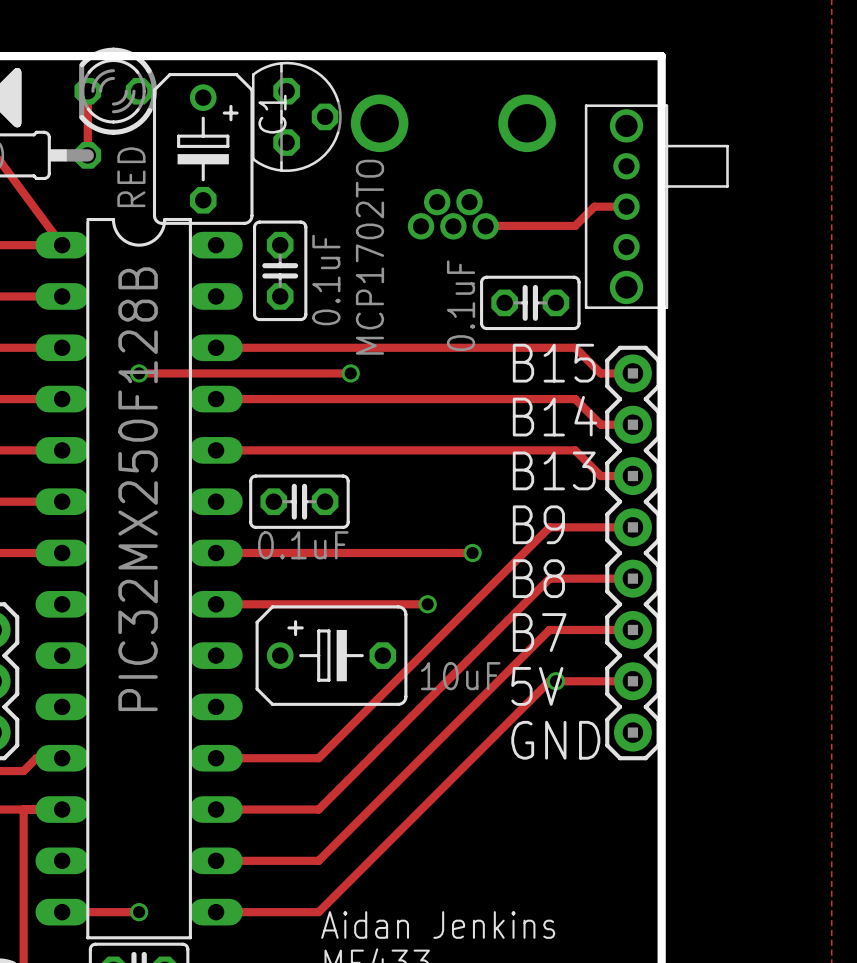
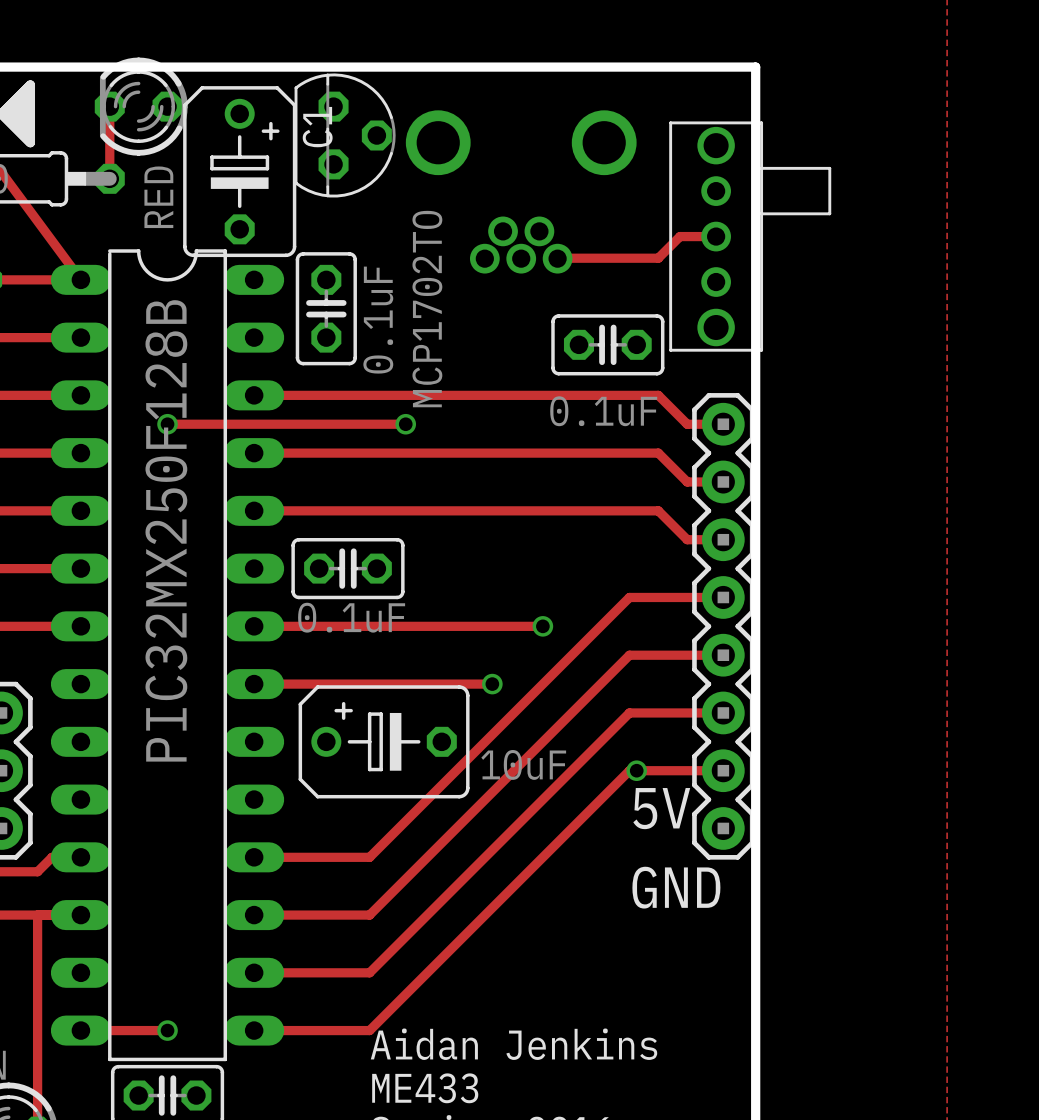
part value rotation: 0° (461, 305) -> 90° clockwise (603, 411)
text: B15 (554, 363) -> none
text: B14 (555, 416) -> none
text: B13 (554, 470) -> none
text: B9 (538, 524) -> none
text: B8 (538, 578) -> none
text: B7 (539, 632) -> none
text position: 5V (537, 686) -> 5V (661, 808)
text position: GND (555, 740) -> GND (676, 887)

